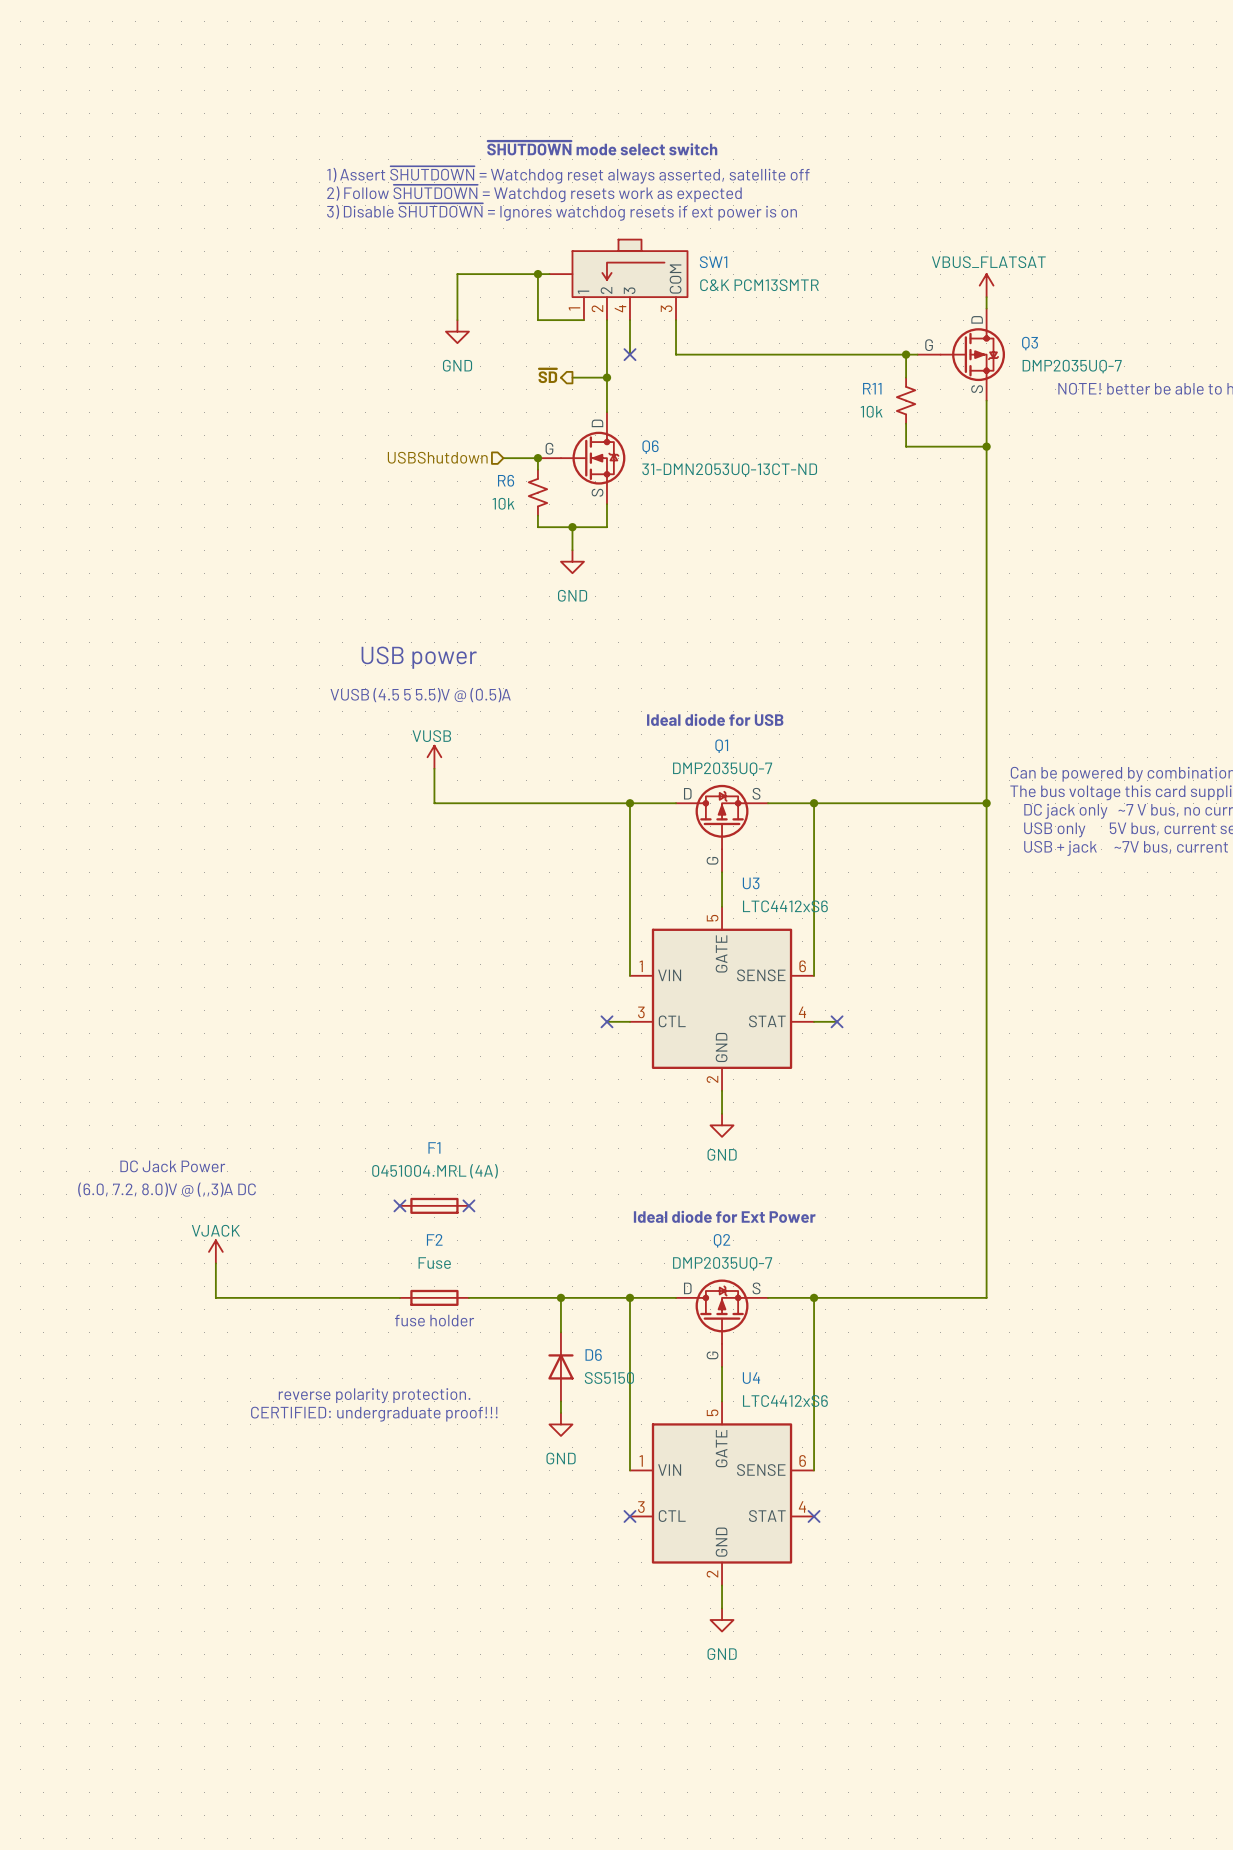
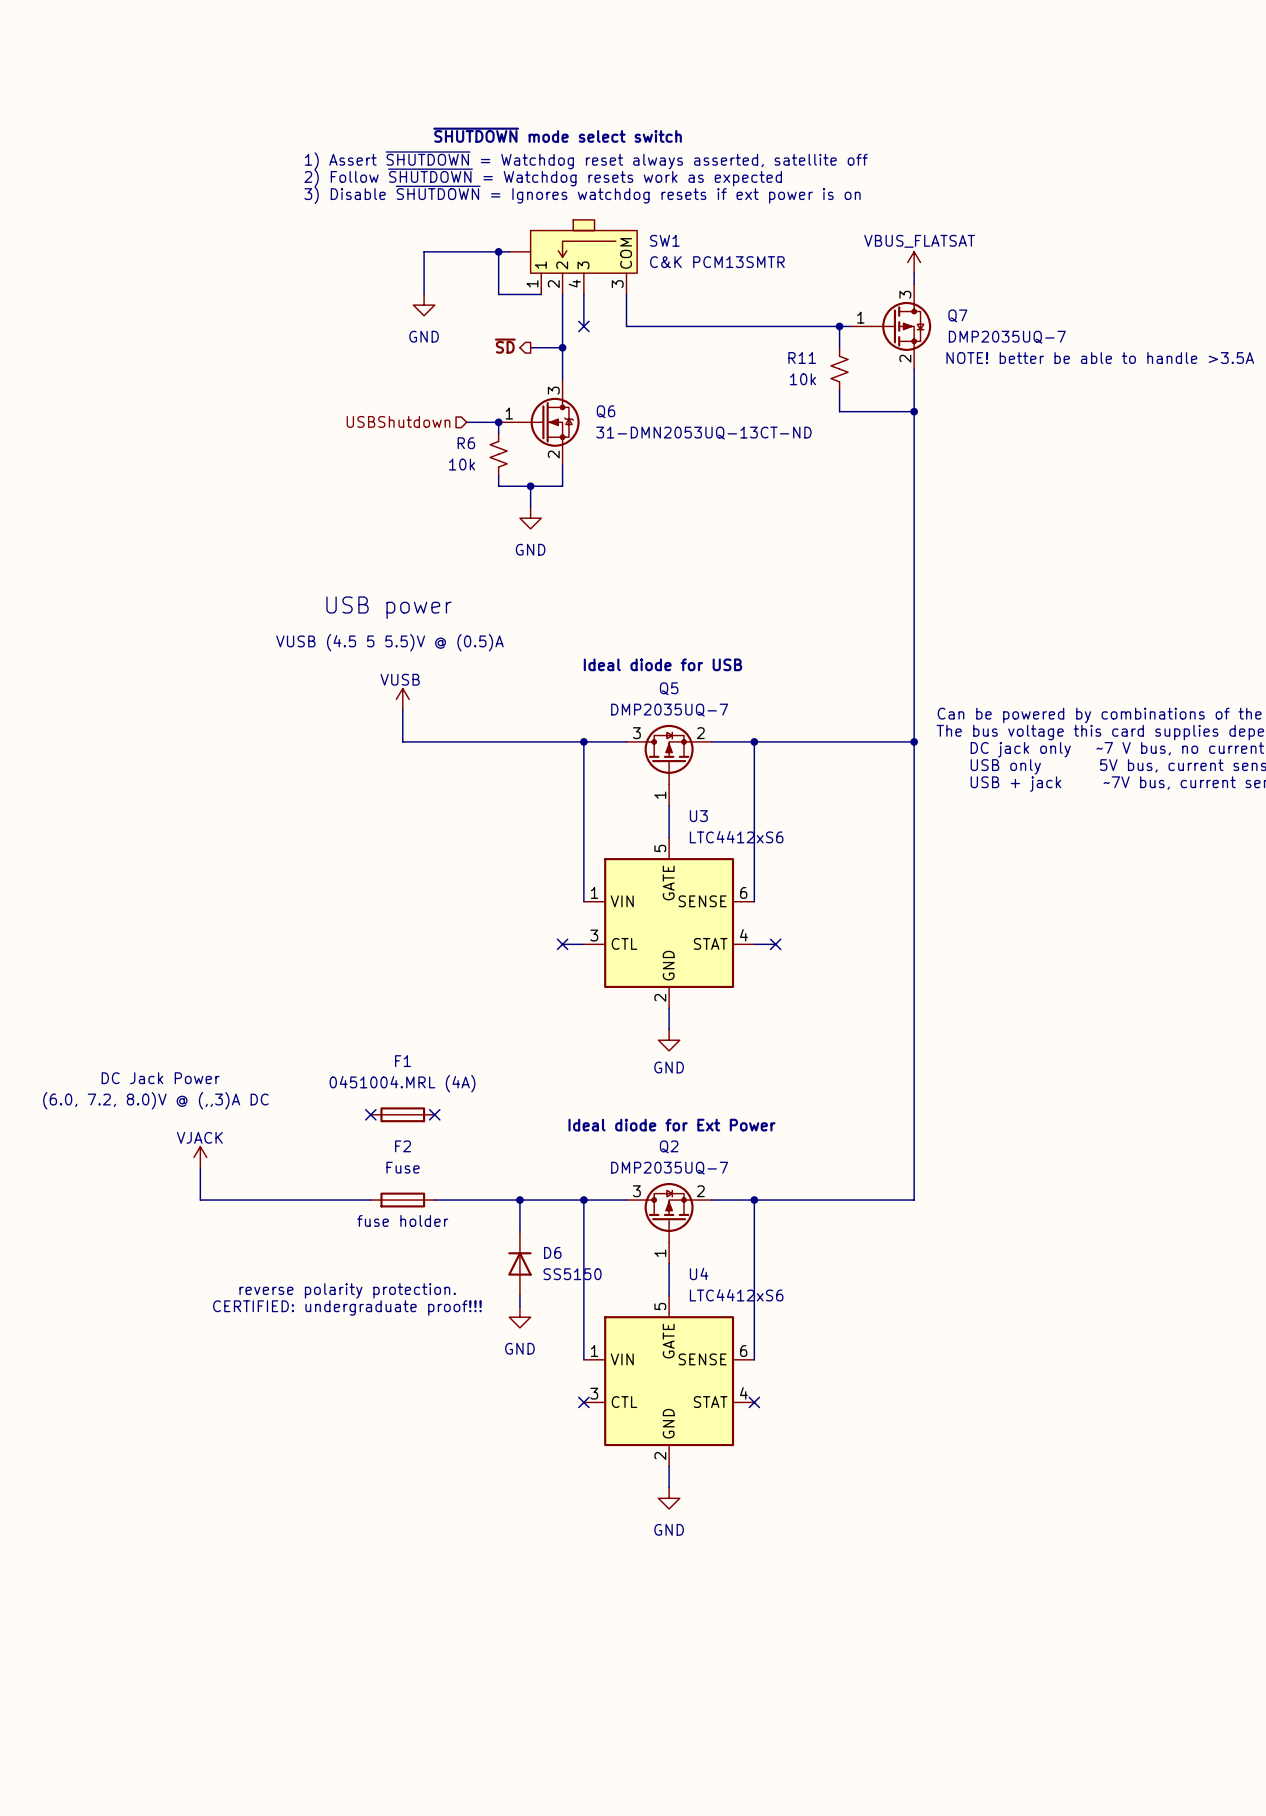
Q3: DMP2035UQ-7 (961, 354) -> none
Q7: none -> DMP2035UQ-7 (890, 326)
Q6 symbol: [537, 412, 626, 505] -> [498, 379, 580, 465]
Q1: DMP2035UQ-7 (722, 828) -> none
Q5: none -> DMP2035UQ-7 (669, 765)
Q2 symbol: [676, 1279, 769, 1367] -> [626, 1182, 712, 1264]

